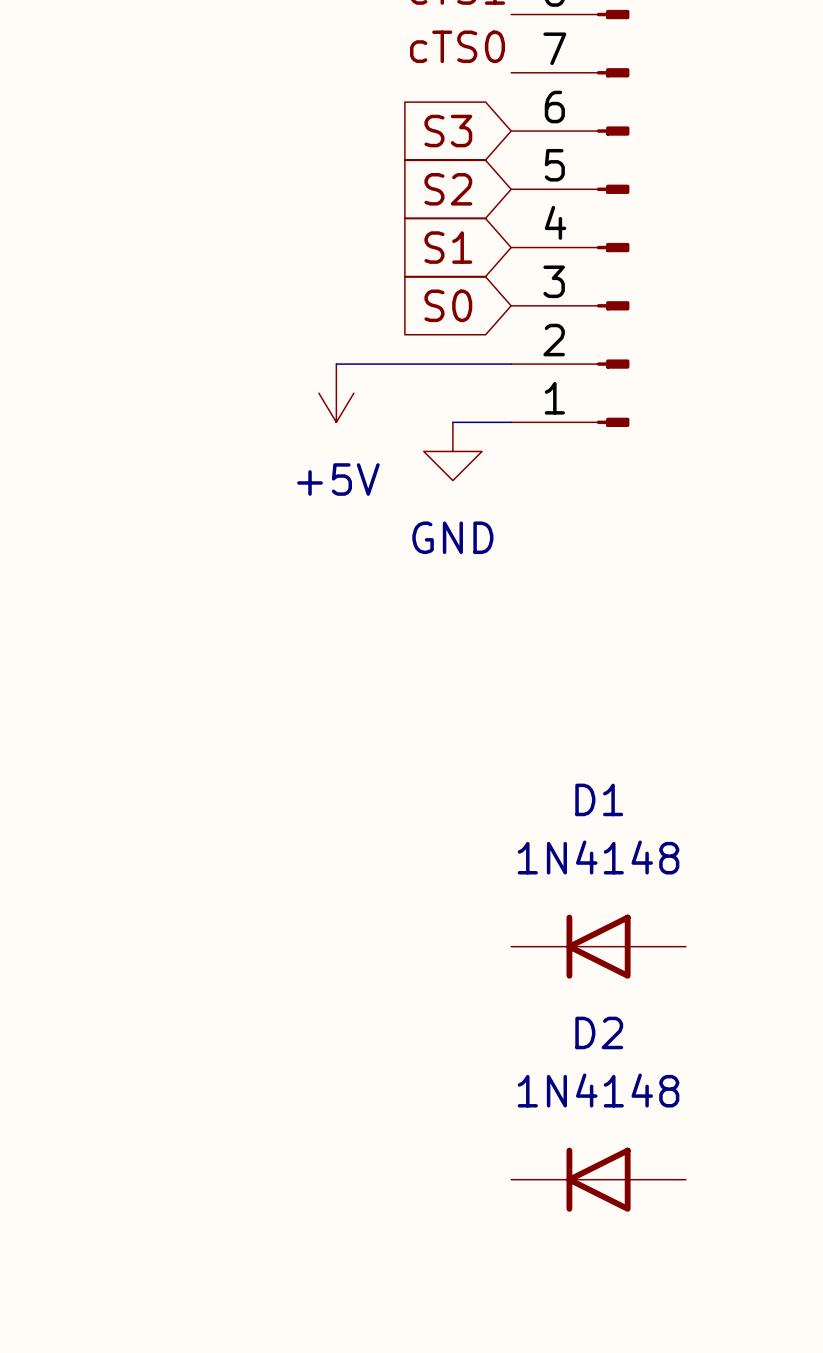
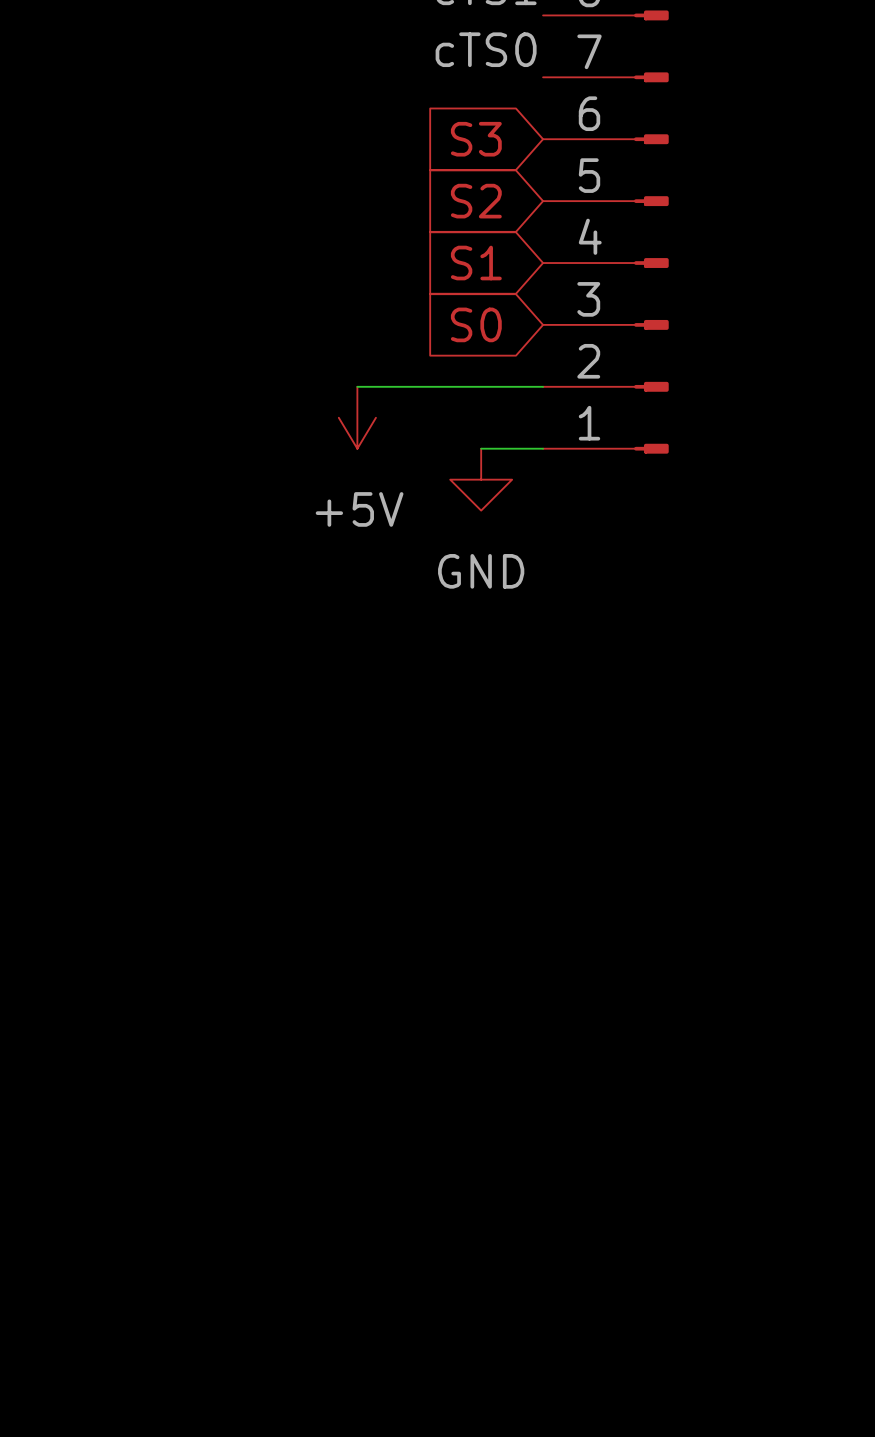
D1: 1N4148 (598, 946) -> none
D2: 1N4148 (598, 1179) -> none

